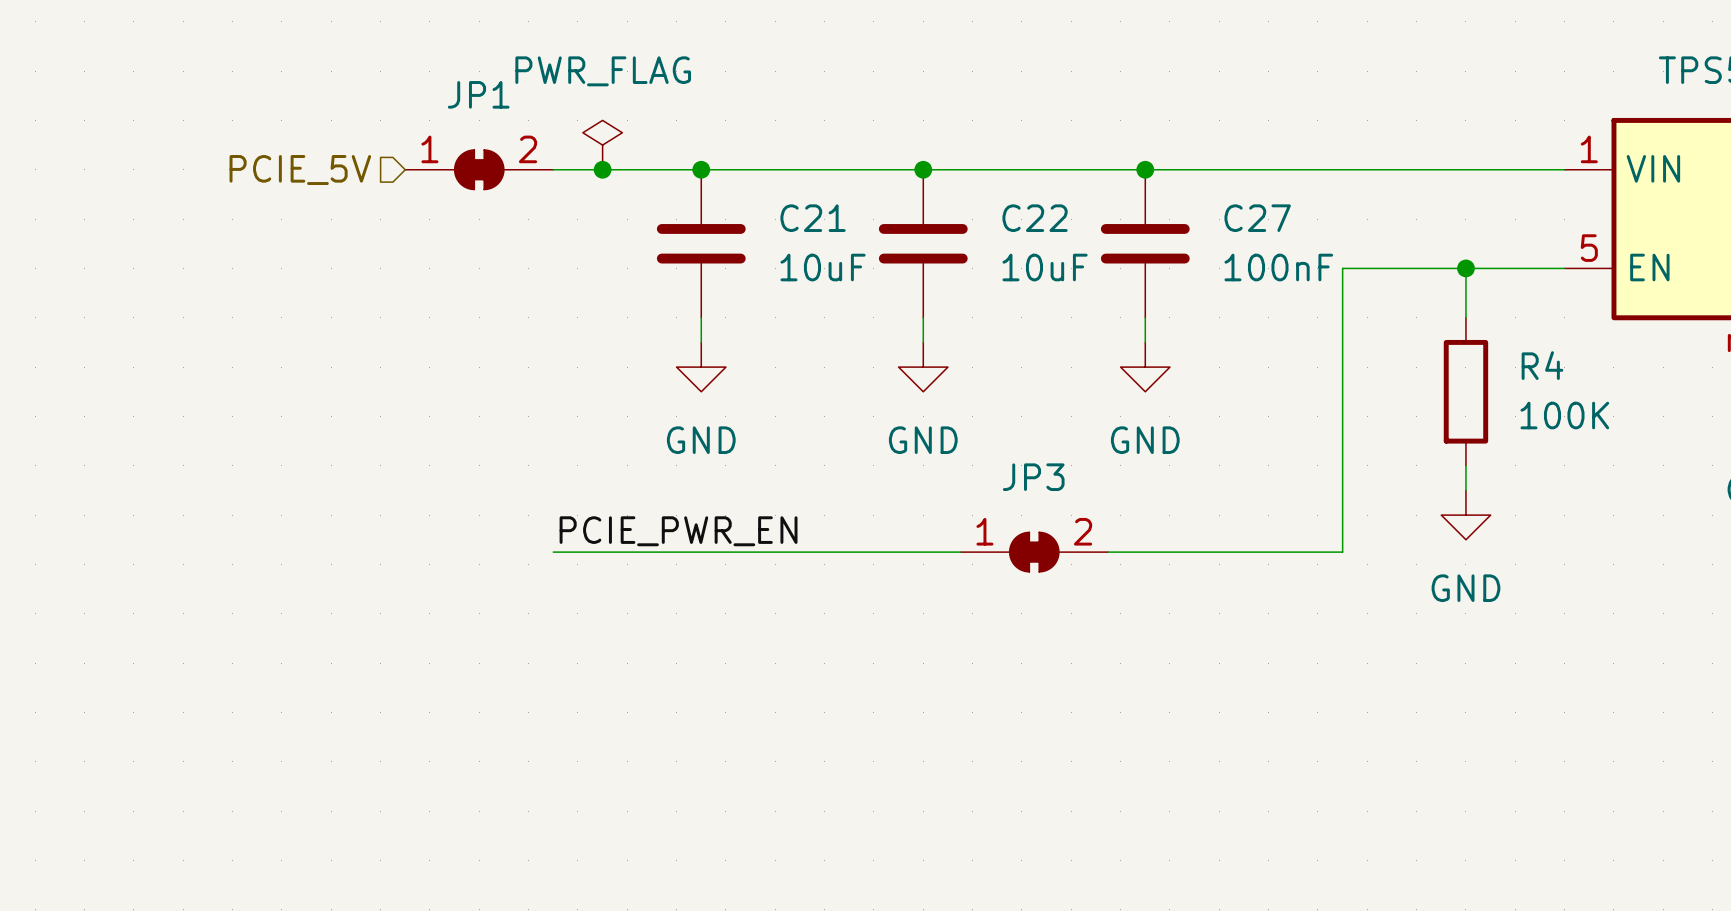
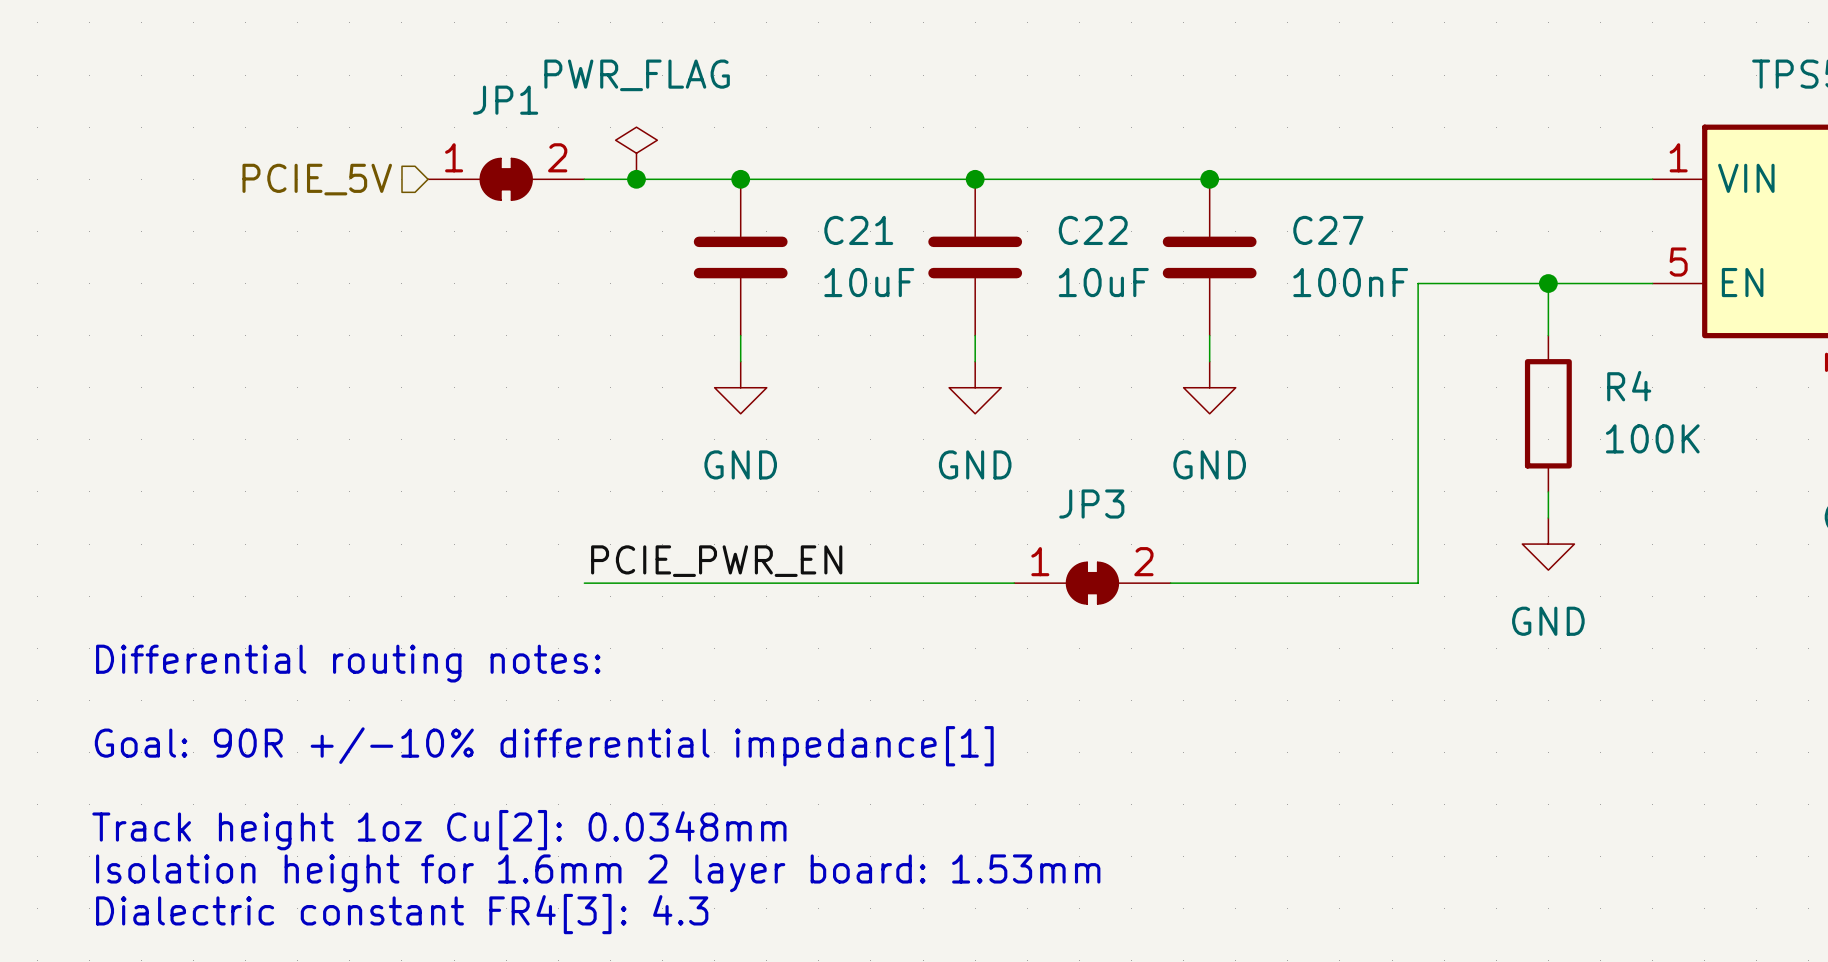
text: none -> Differential routing notes: (348, 663)
text: none -> Goal: 90R +/-10% differential impedance[1] (544, 746)
text: none -> Track height 1oz Cu[2]: 0.0348mm (439, 830)
text: none -> Isolation height for 1.6mm 2 layer board: 1.53mm (598, 873)
text: none -> Dialectric constant FR4[3]: 4.3 (402, 914)

